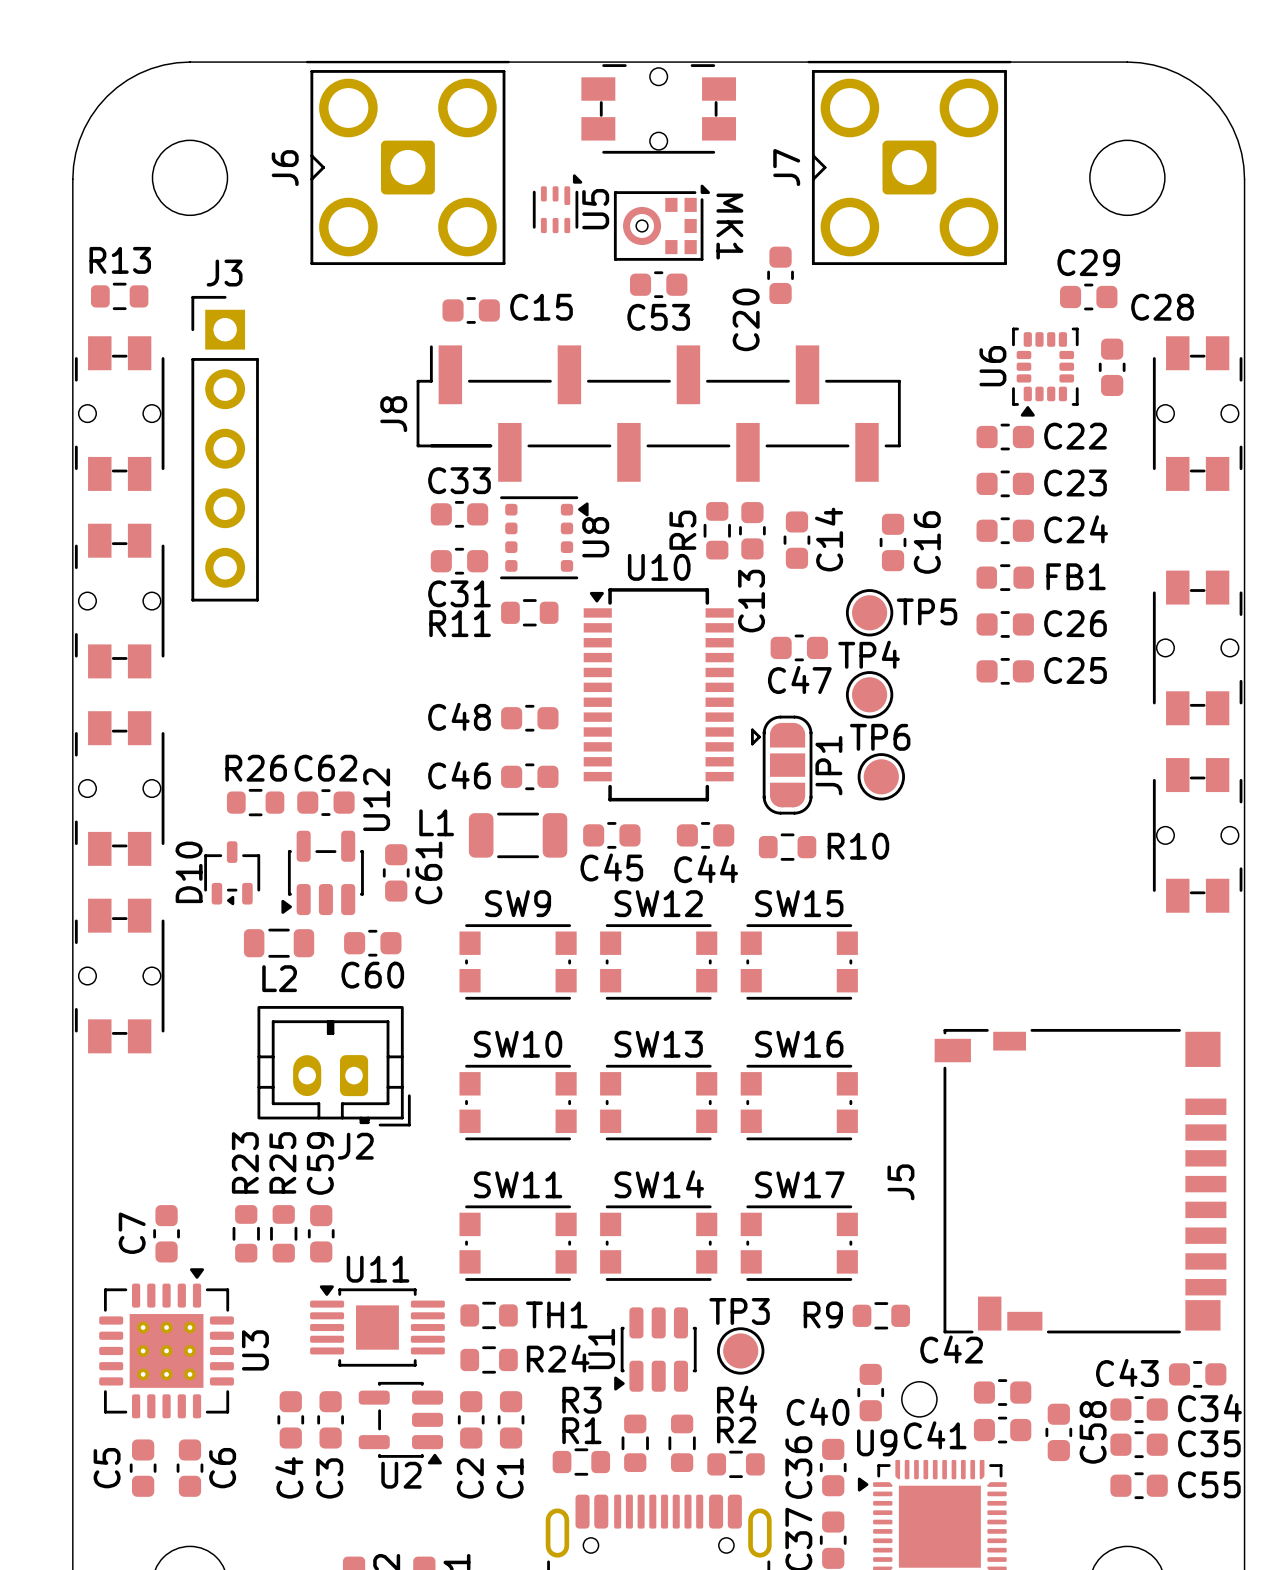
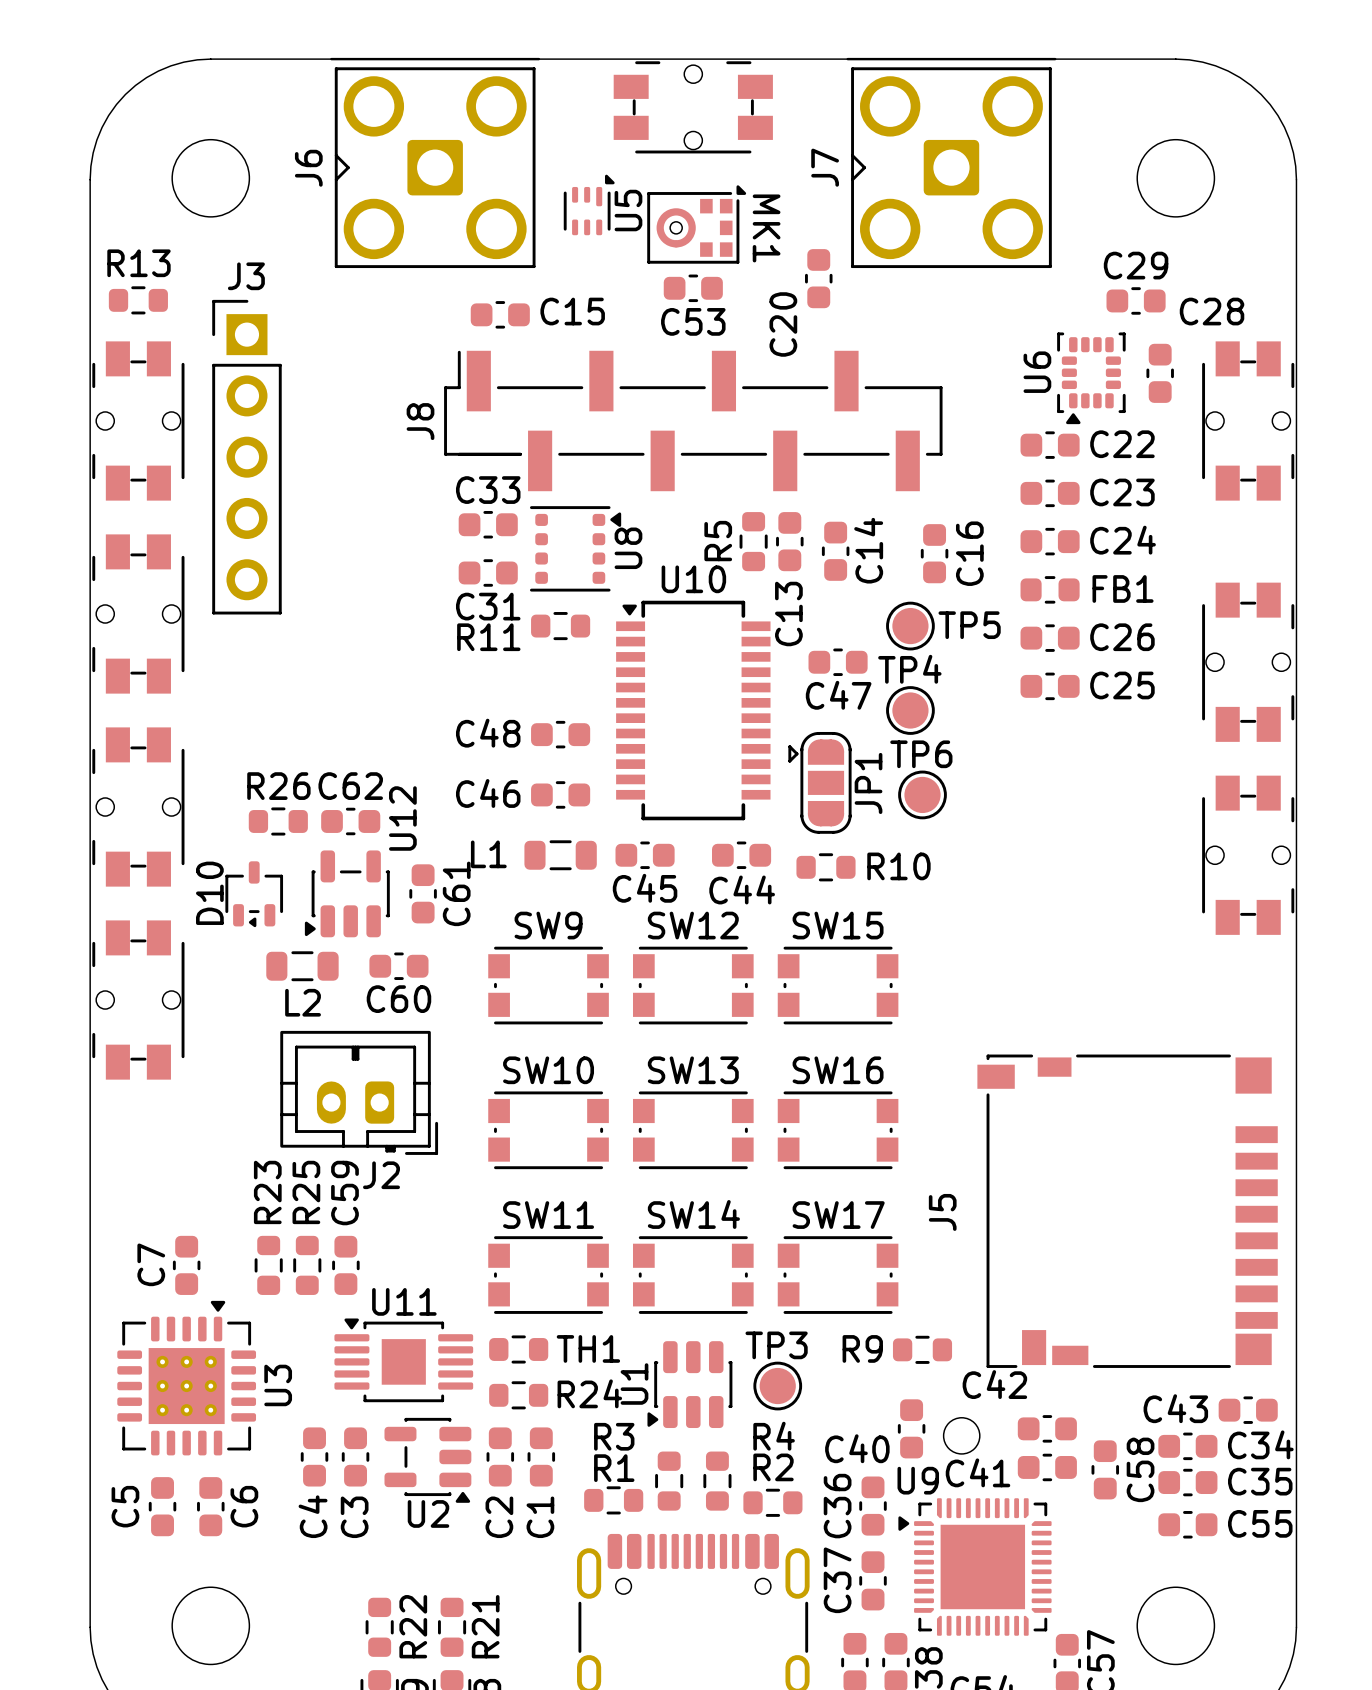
L1 footprint: [468, 812, 568, 859] -> [524, 840, 597, 871]

